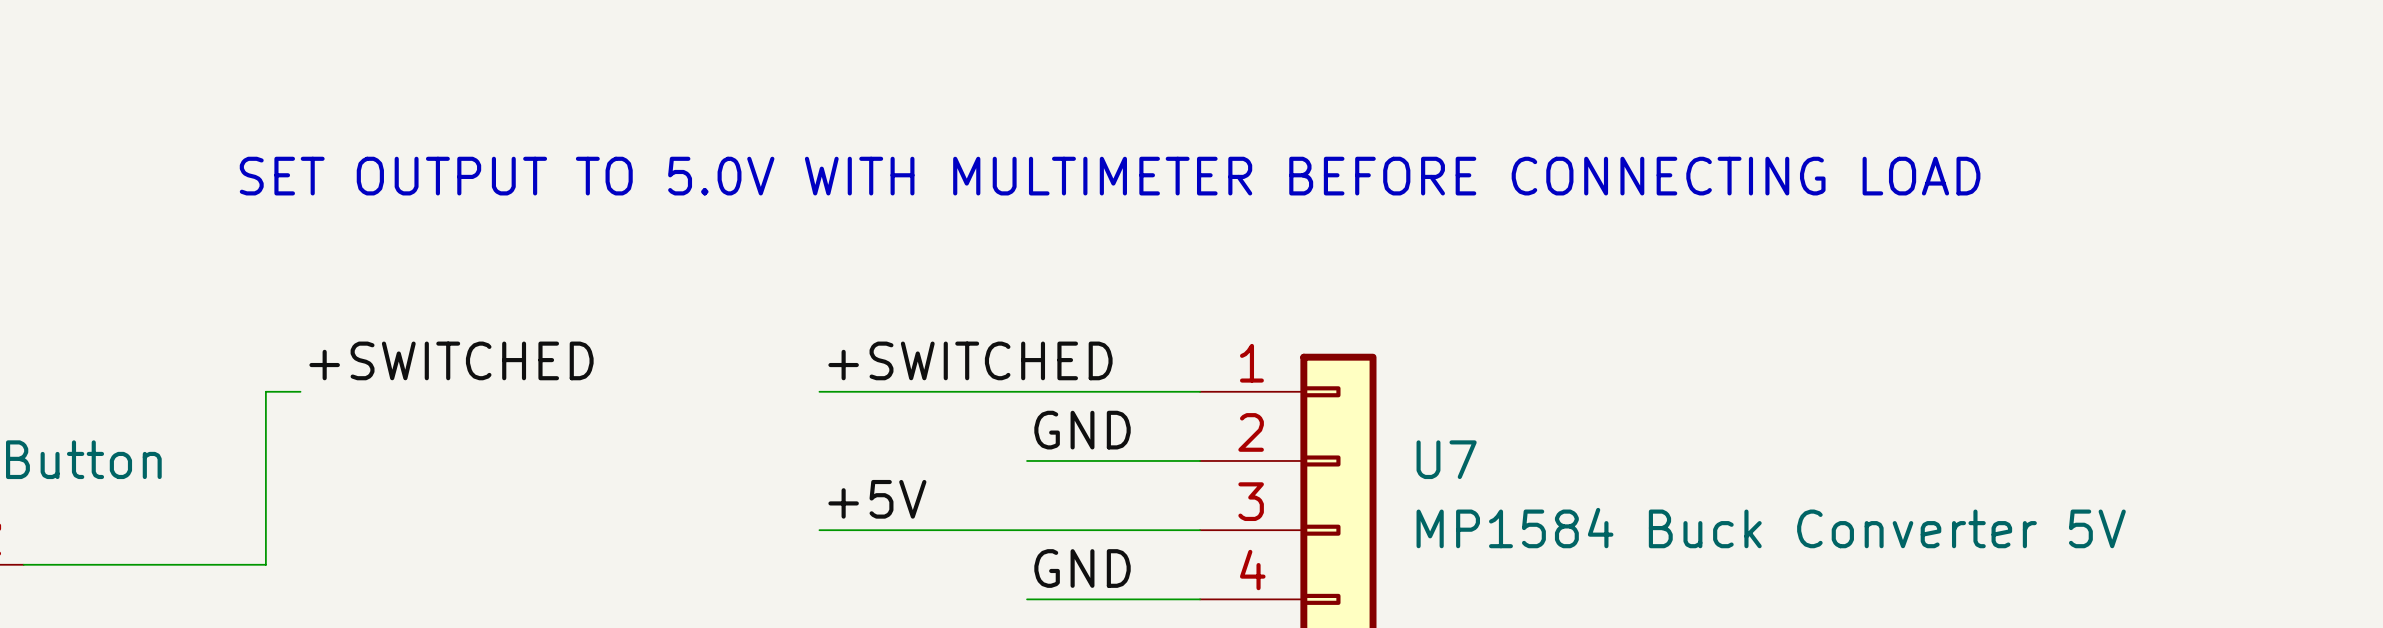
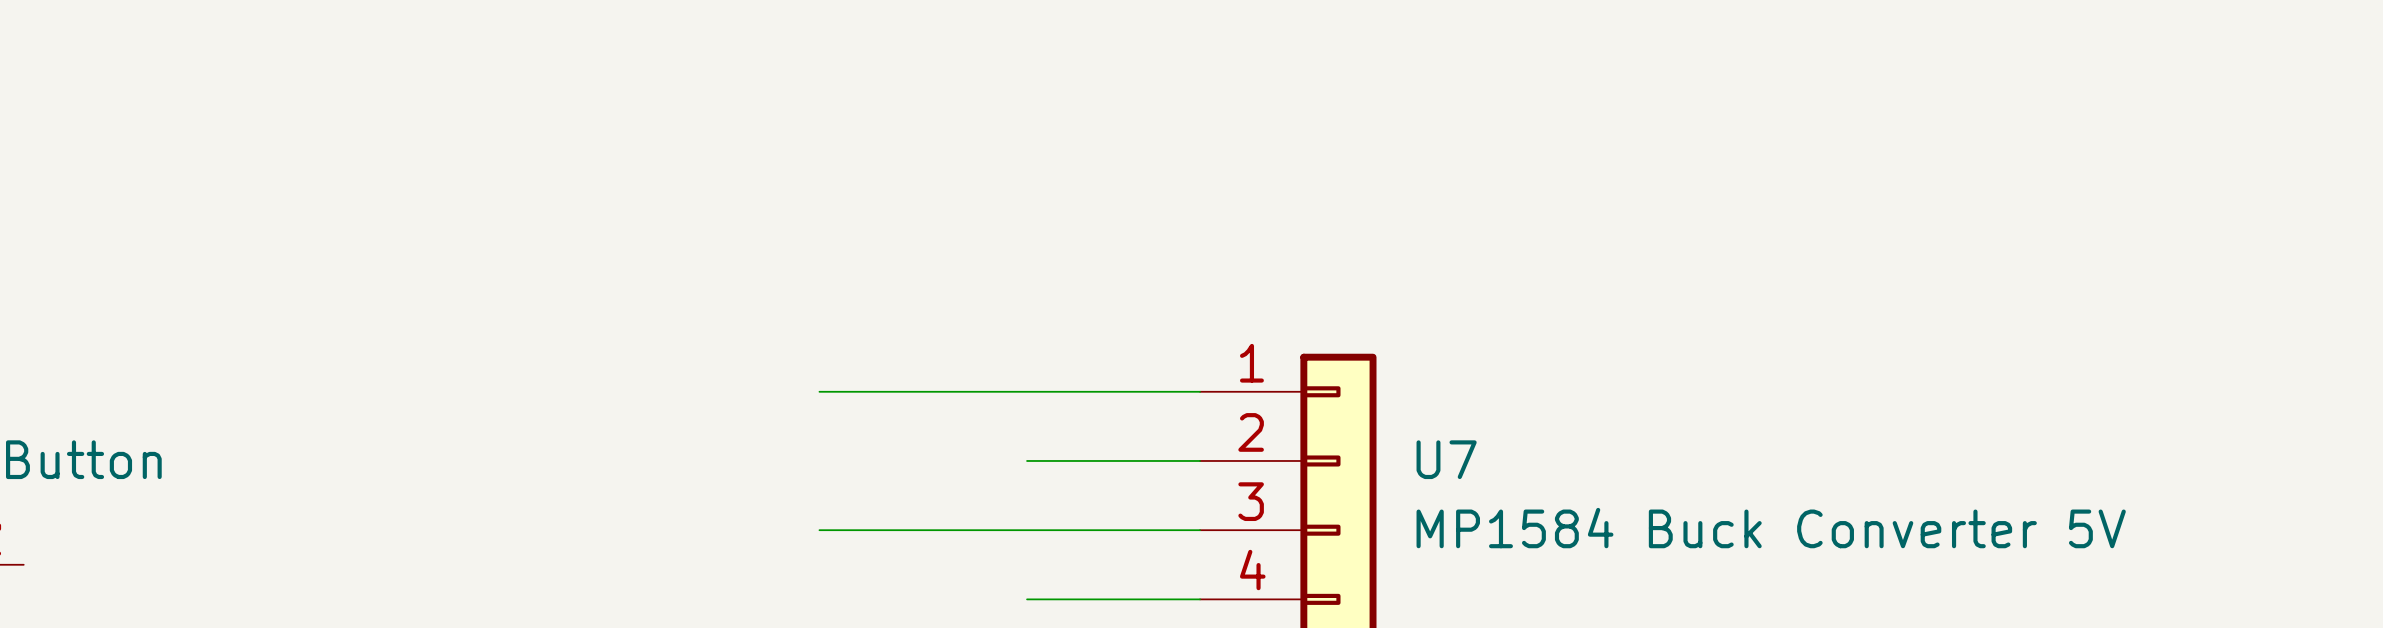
text: SET OUTPUT TO 5.0V WITH MULTIMETER BEFORE CONNECTING LOAD (1110, 176) -> none
label: +SWITCHED (451, 360) -> none
label: +SWITCHED (970, 360) -> none
wire: (300, 391) (265, 391) (265, 564) (23, 564) -> none
label: GND (1082, 430) -> none
label: +5V (877, 499) -> none
label: GND (1082, 568) -> none

